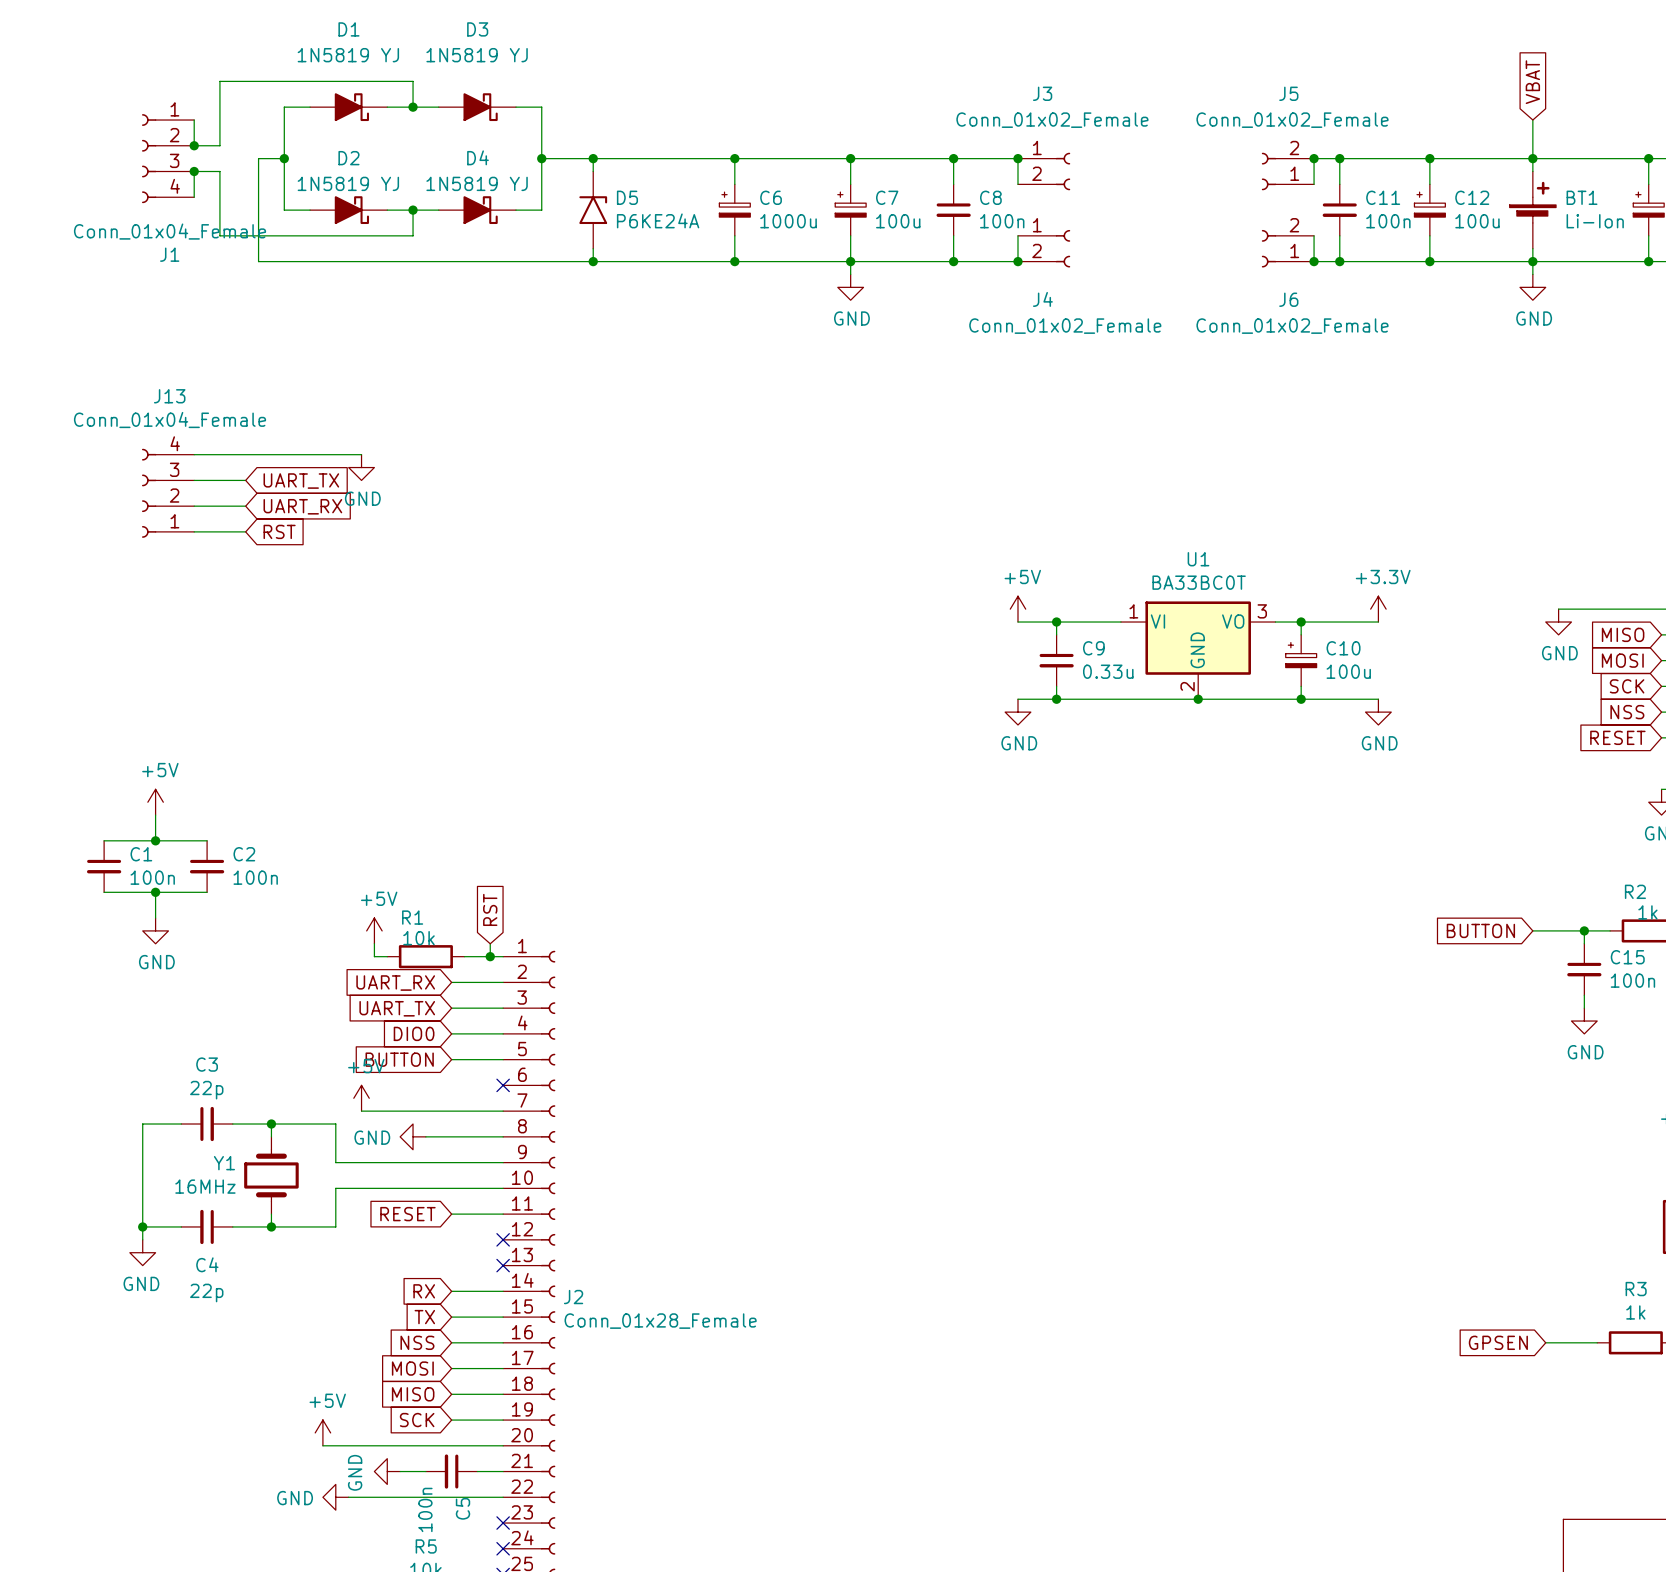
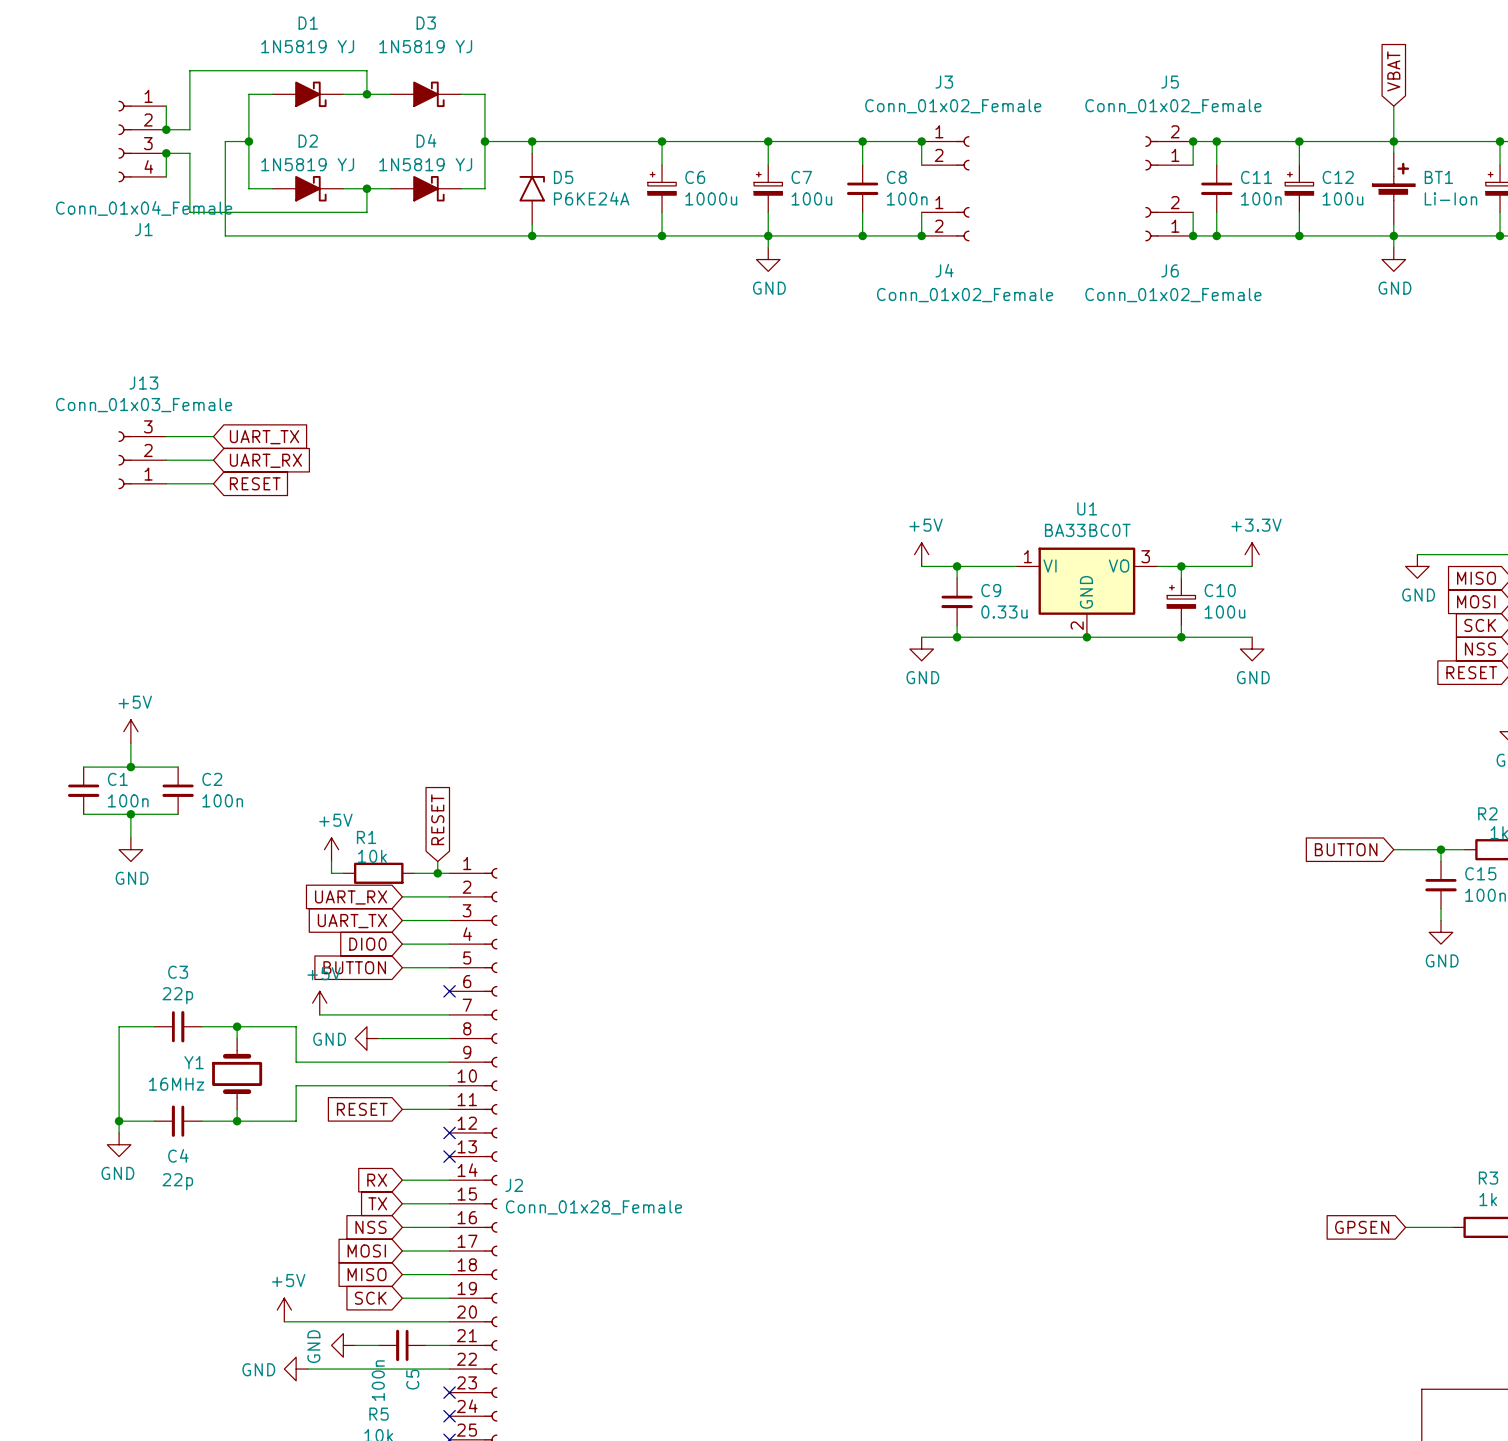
J13 value: Conn_01x04_Female (170, 420) -> Conn_01x03_Female (144, 405)
J13 symbol: [141, 448, 195, 538] -> [118, 431, 167, 490]
wire: (194, 454) (361, 454) -> none
power symbol: GND (361, 467) -> none
global label: RST (279, 531) -> RESET (255, 483)
global label: RST (490, 909) -> RESET (437, 819)

